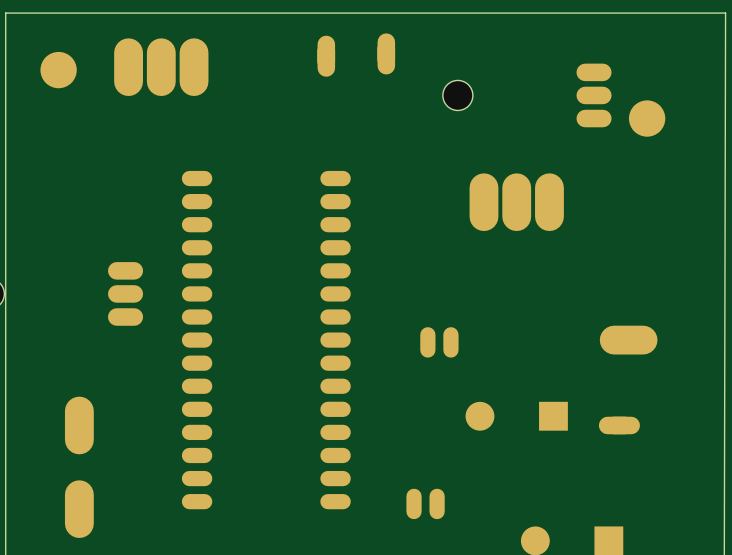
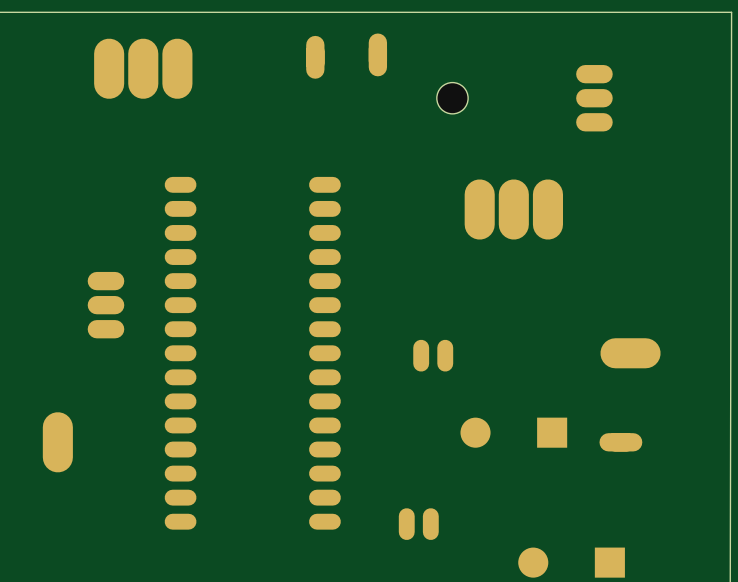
part: (58, 70) -> none
part: (647, 118) -> none
part: (79, 509) -> none

